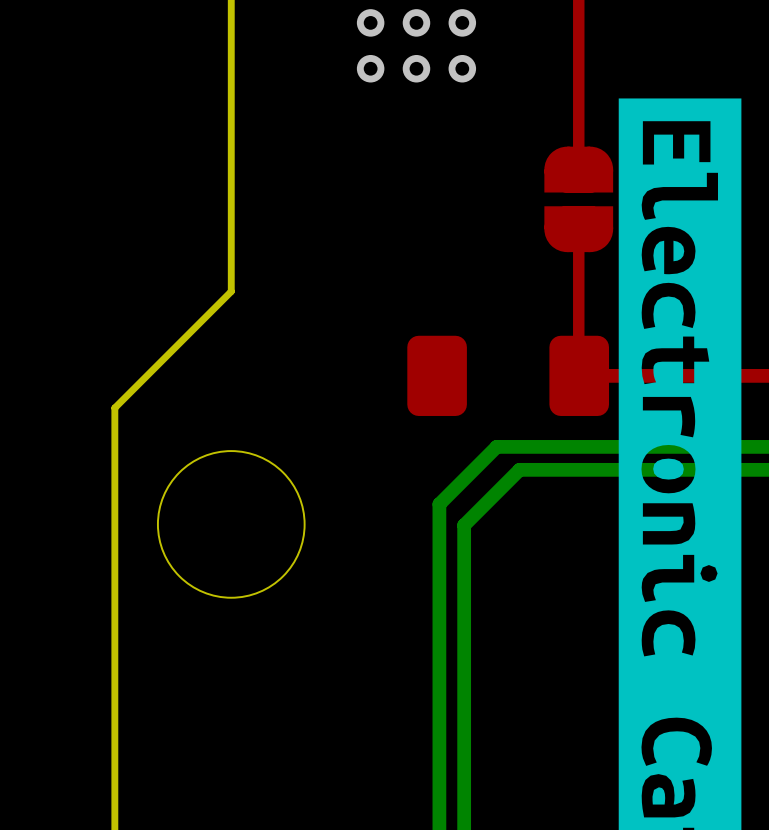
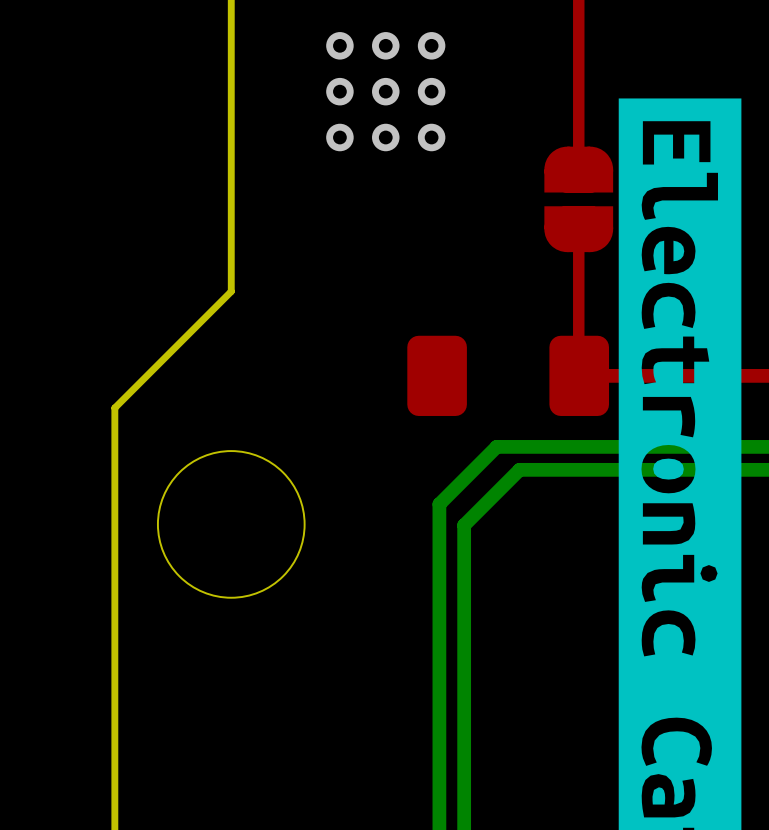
via: (370, 22) -> none
via: (416, 22) -> none
via: (462, 22) -> none
via: none -> (339, 45)
via: none -> (385, 45)
via: none -> (431, 45)
via: (370, 68) -> none
via: (416, 68) -> none
via: (462, 68) -> none
via: none -> (339, 91)
via: none -> (385, 91)
via: none -> (431, 91)
via: none -> (339, 137)
via: none -> (385, 137)
via: none -> (431, 137)

